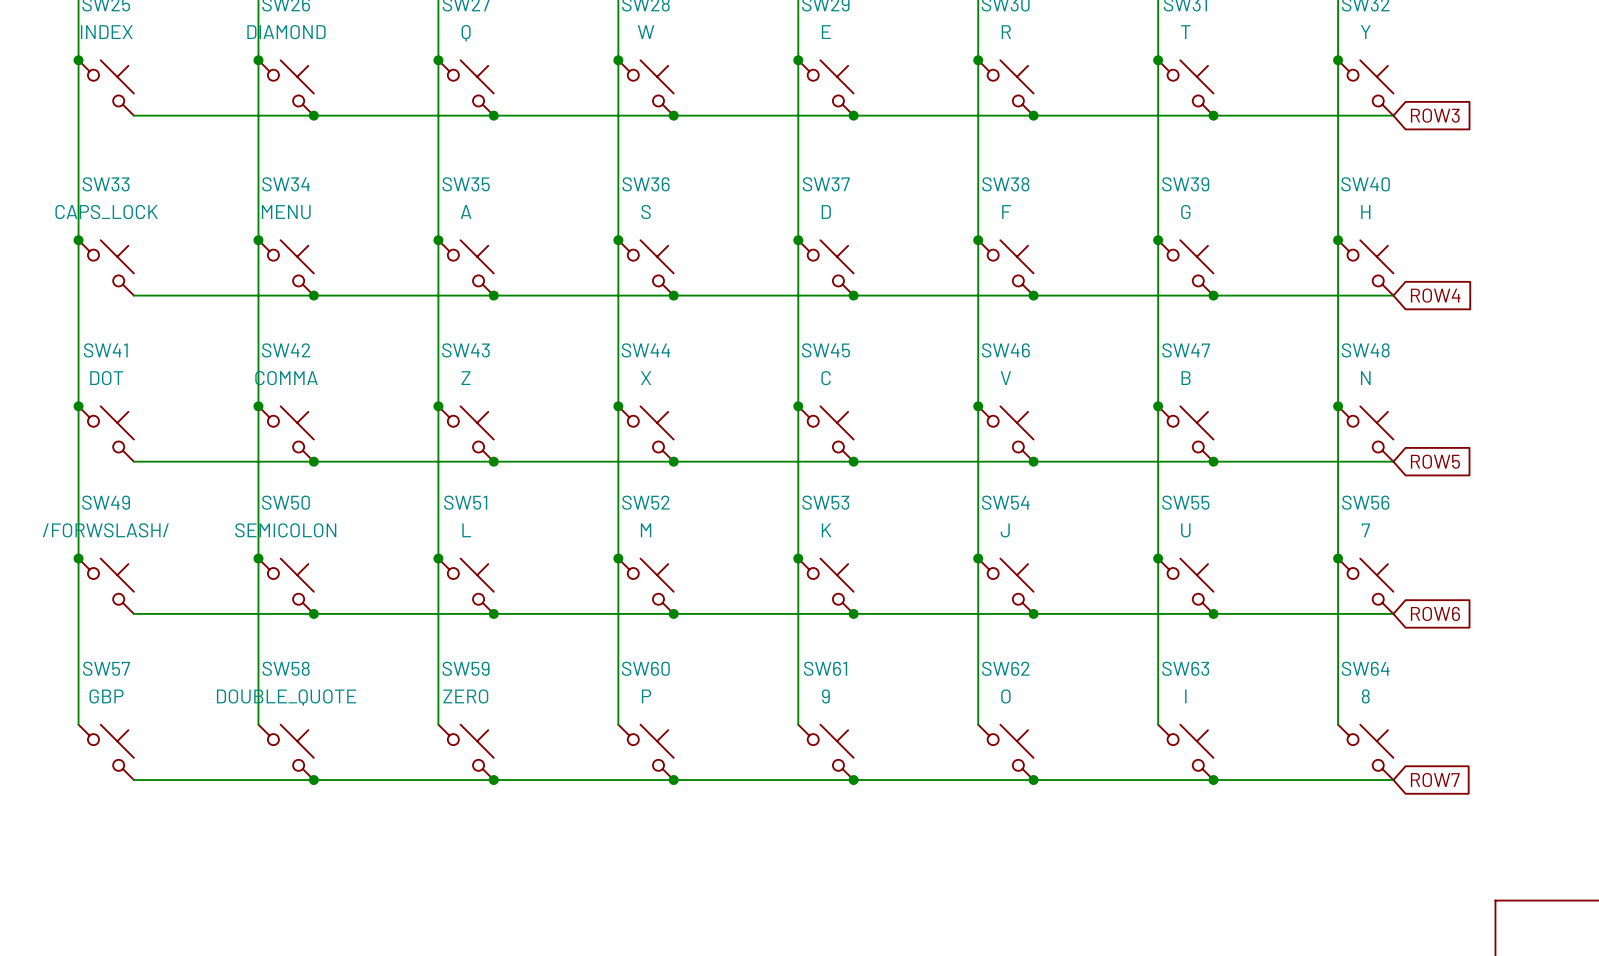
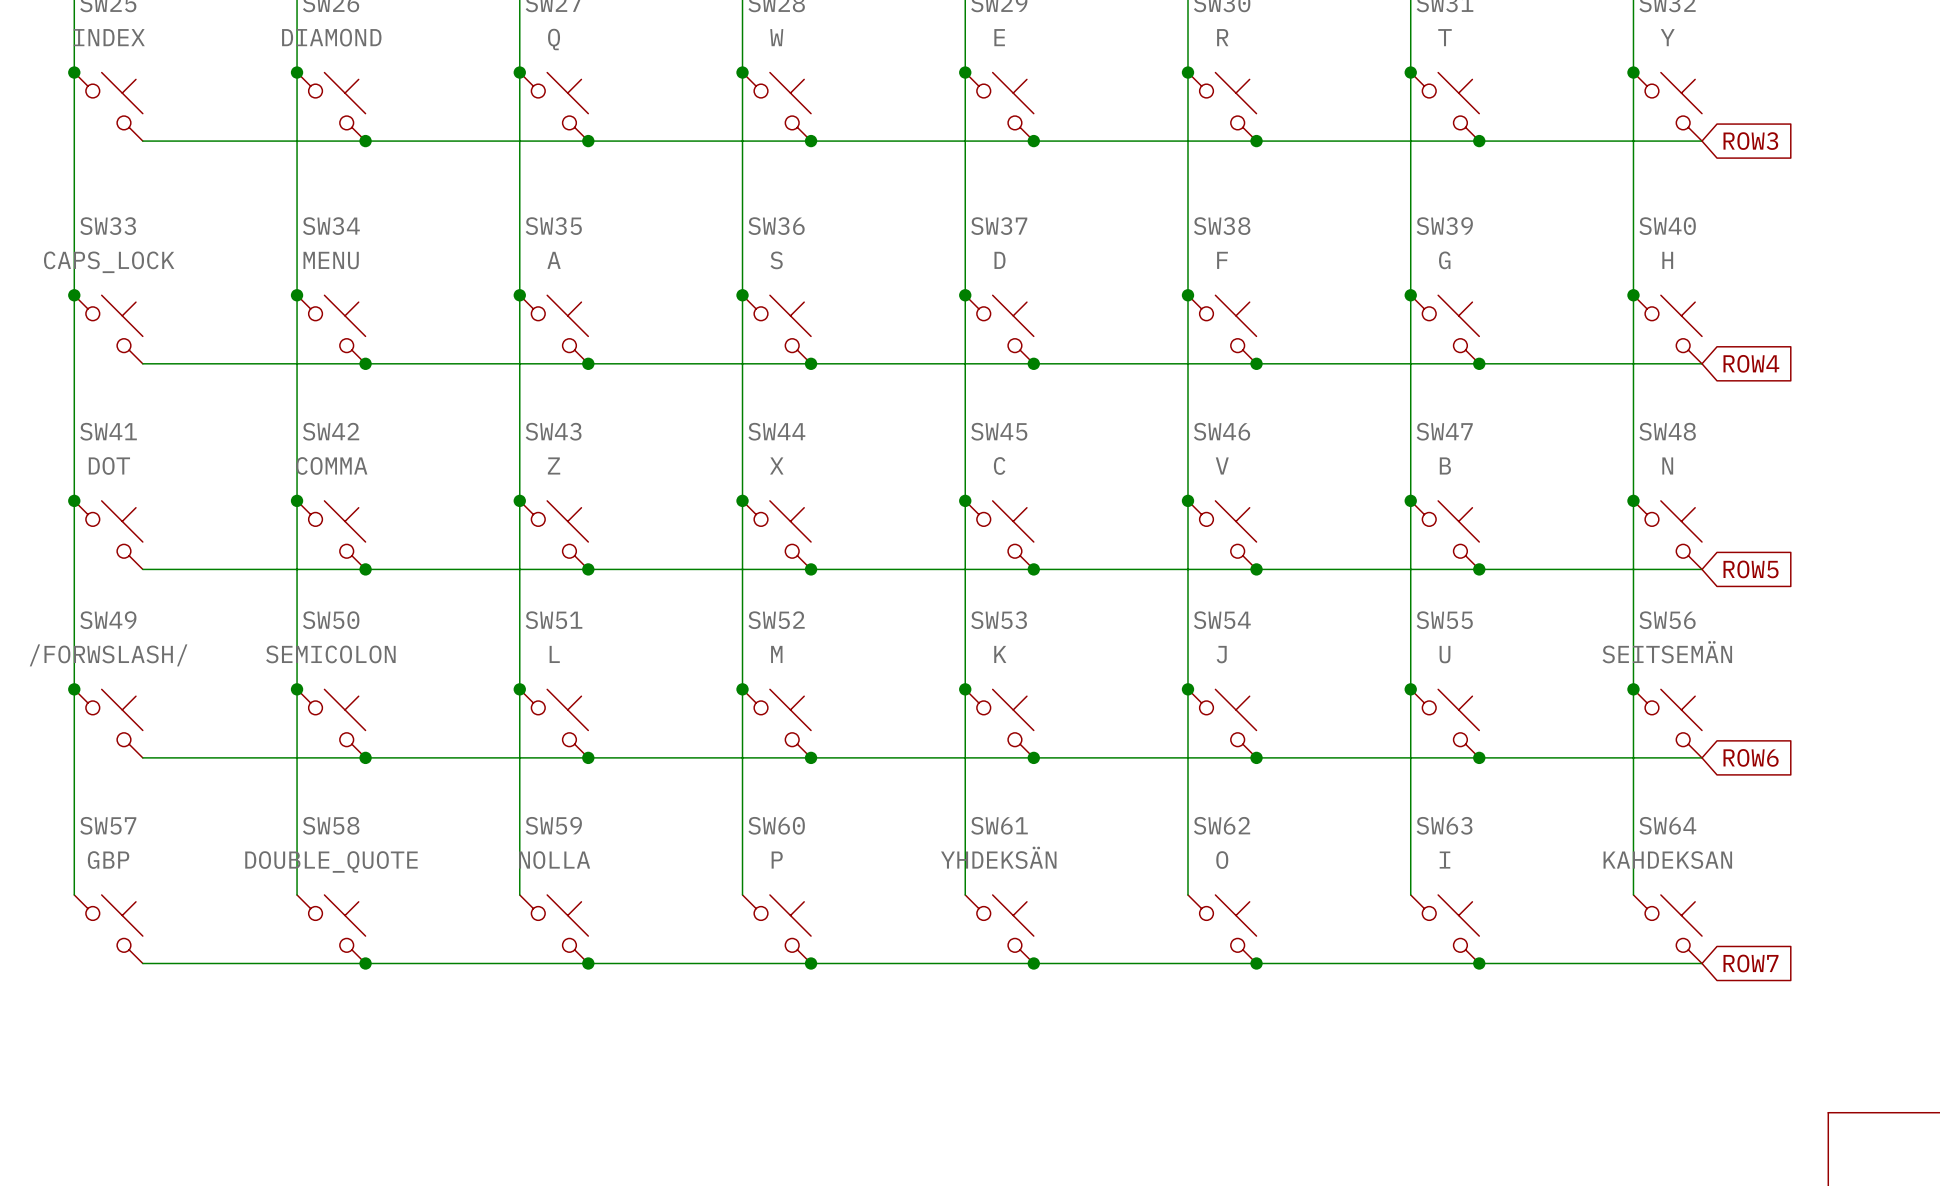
SW56 value: 7 (1365, 530) -> SEITSEMÄN (1667, 652)
SW59 value: ZERO (465, 696) -> NOLLA (554, 860)
SW61 value: 9 (825, 696) -> YHDEKSÄN (998, 857)
SW64 value: 8 (1365, 696) -> KAHDEKSAN (1667, 860)

